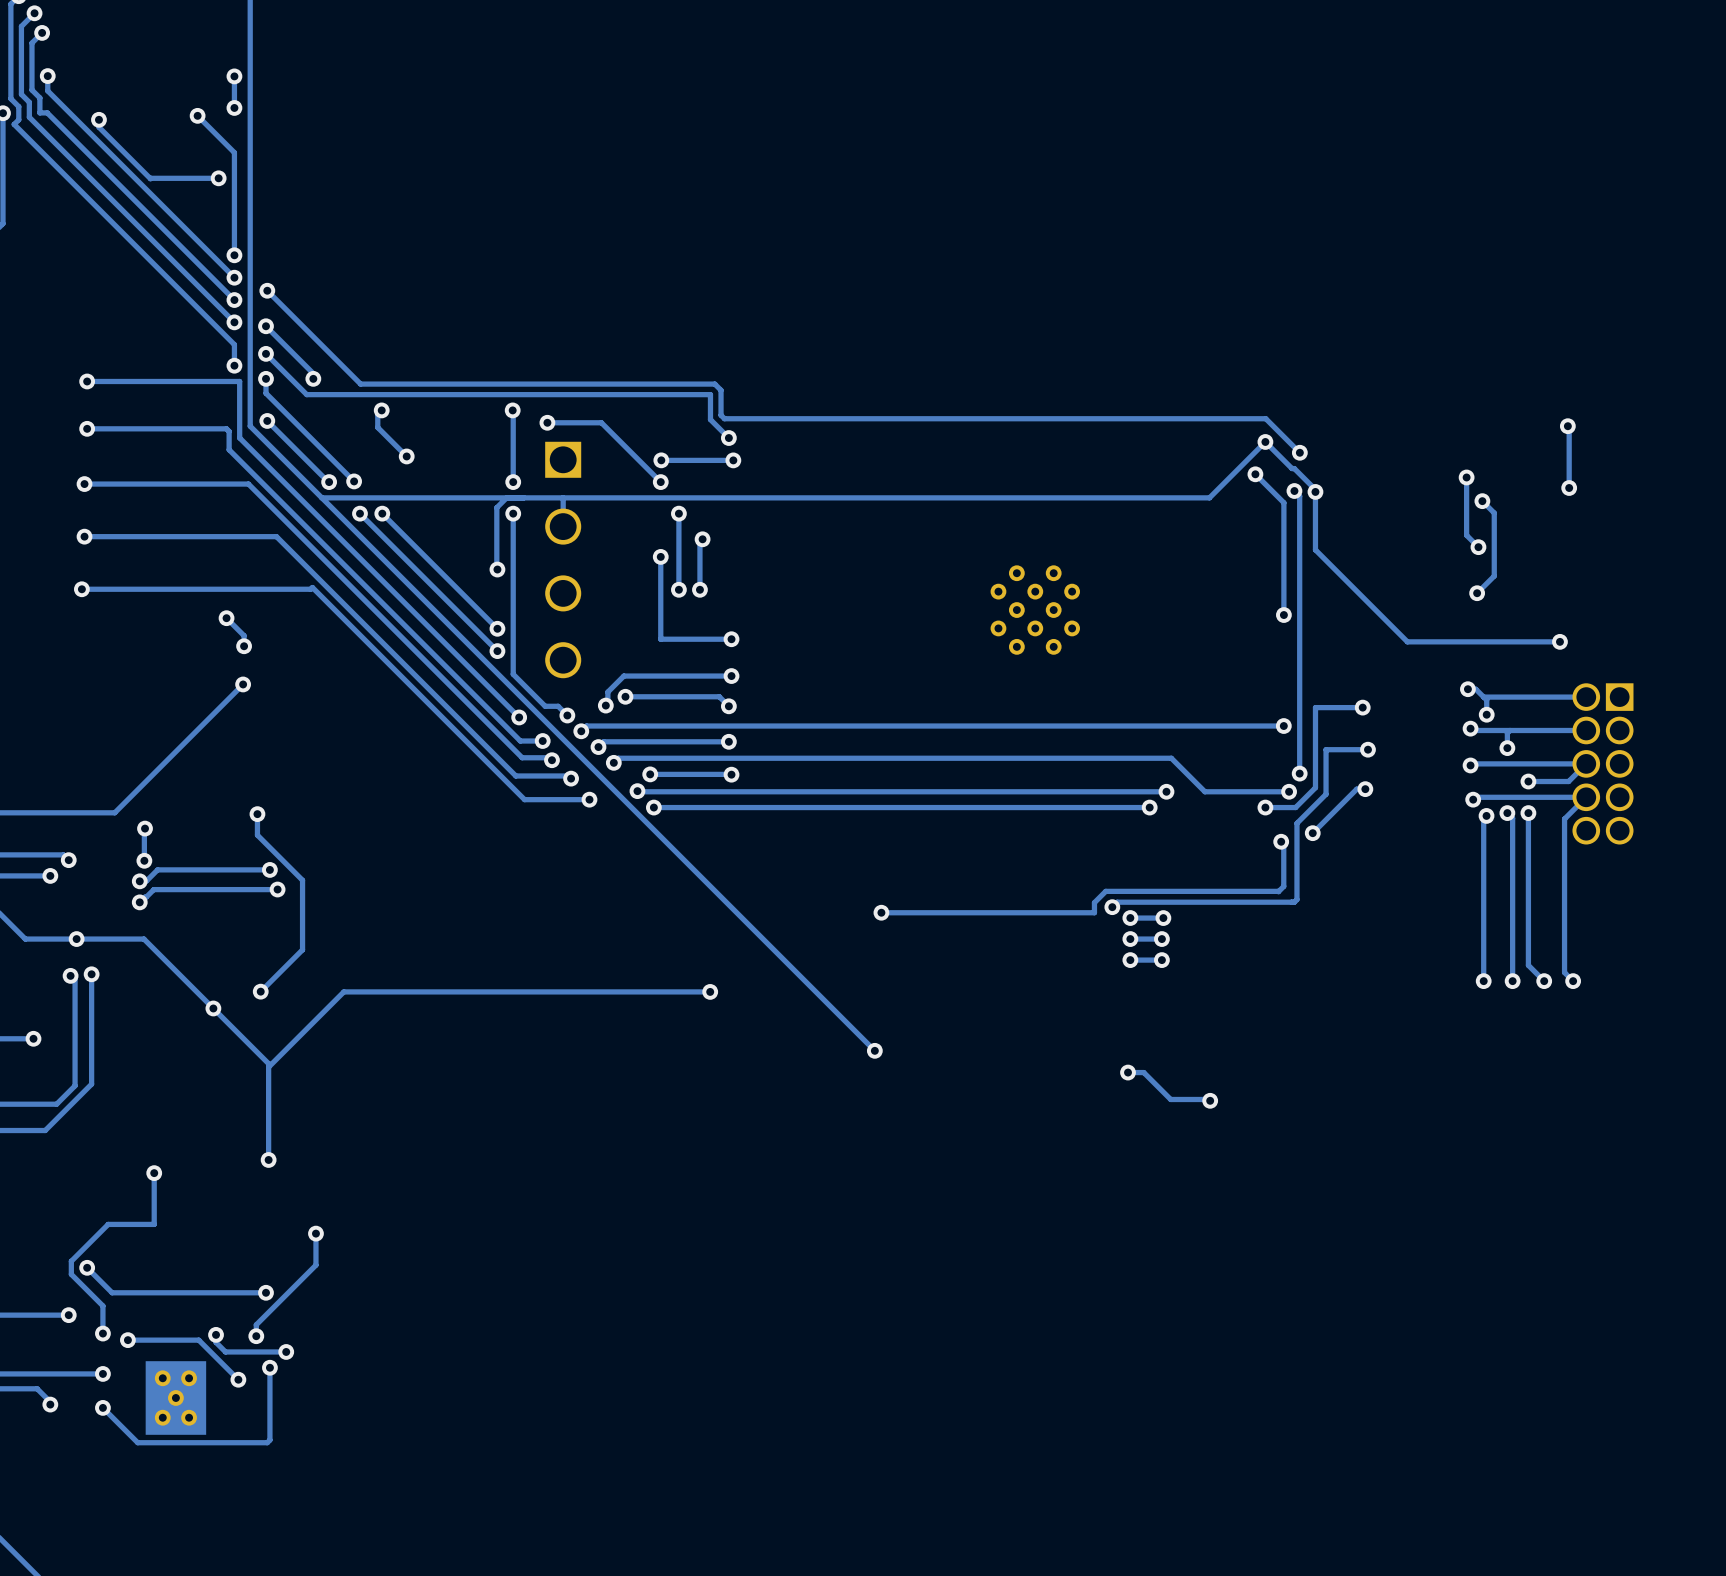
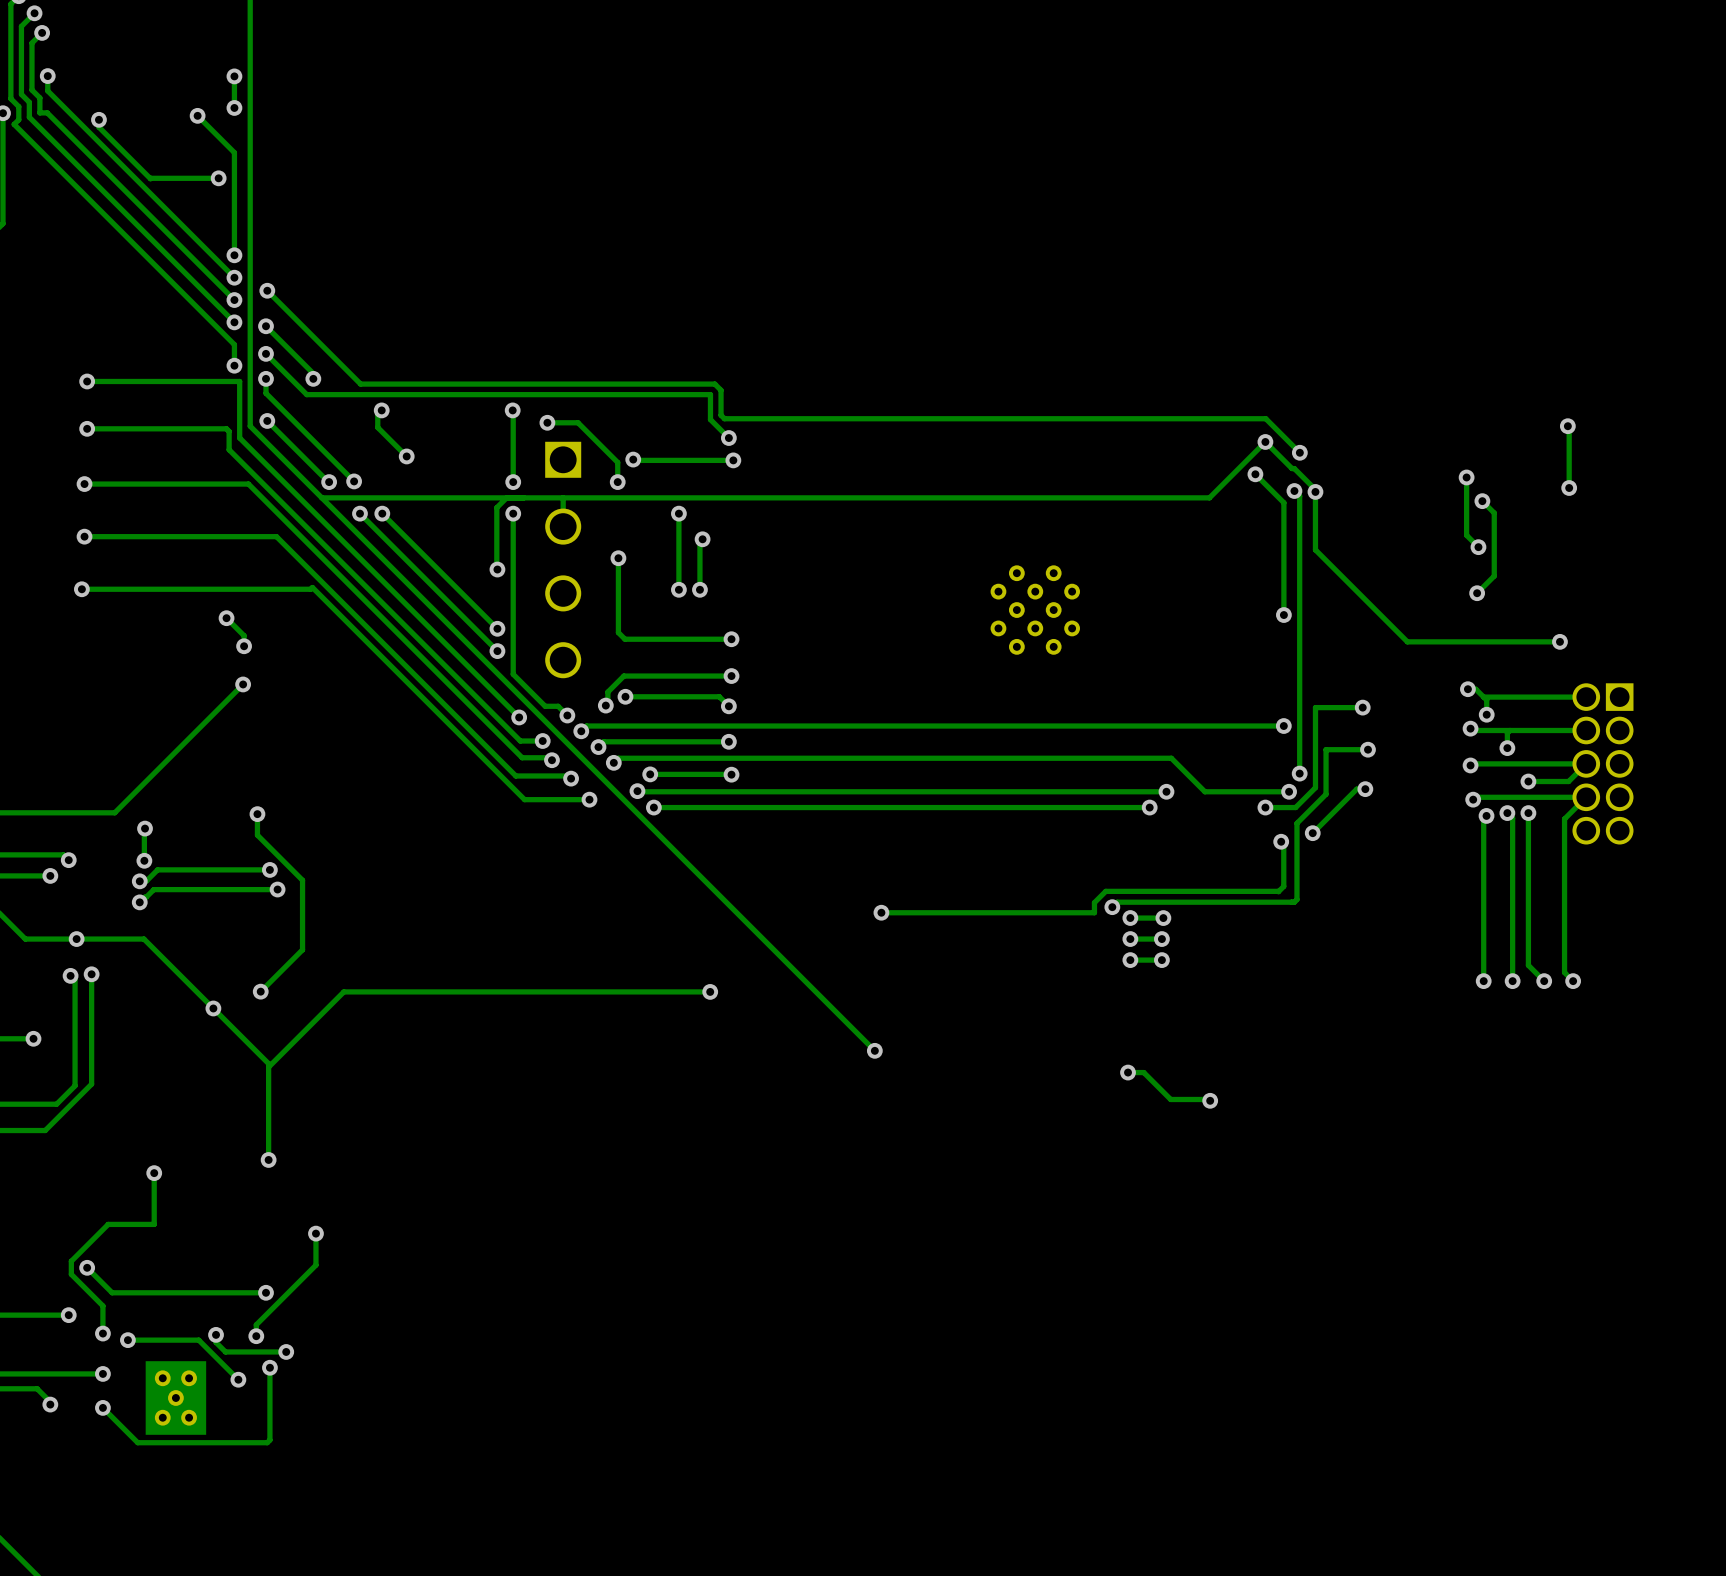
track: (578, 422) (601, 422) (660, 482) -> (578, 422) (617, 462) (617, 482)
track: none -> (633, 459) (661, 460)
via: none -> (633, 459)
via: (661, 460) -> none
via: none -> (617, 482)
via: (660, 482) -> none
track: (660, 556) (660, 639) -> (618, 558) (618, 632) (625, 639) (660, 639)
via position: (660, 556) -> (618, 558)

